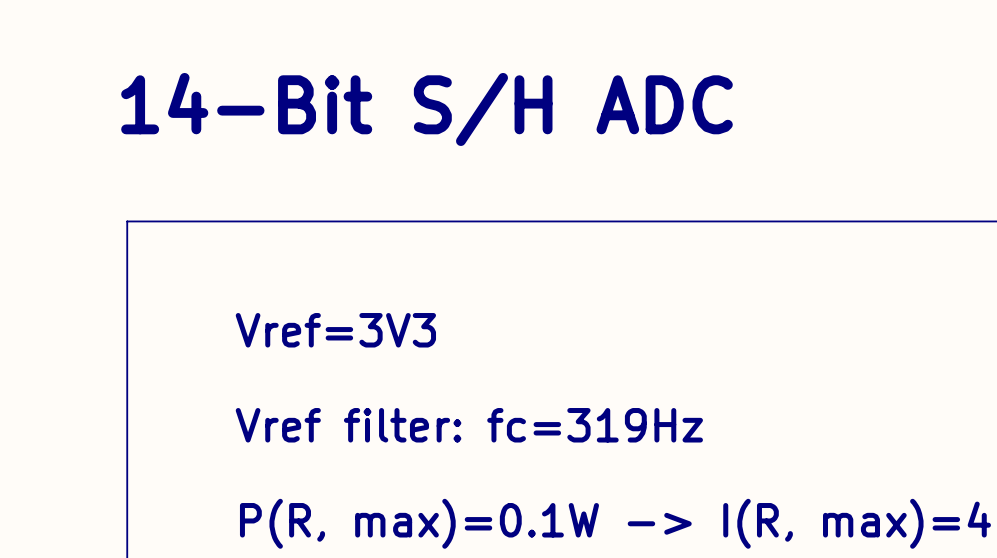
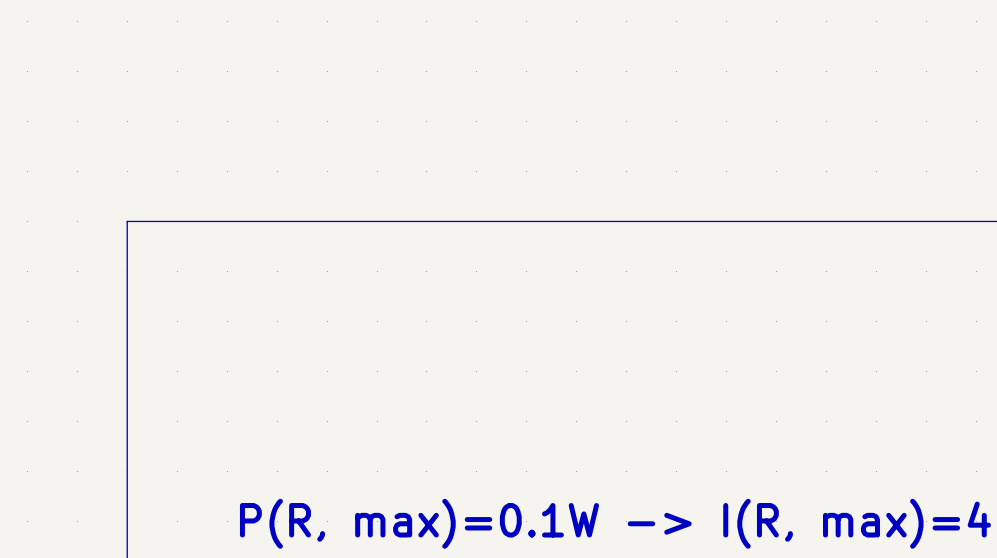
text: 14-Bit S/H ADC (426, 109) -> none
text: Vref=3V3 (335, 330) -> none
text: Vref filter: fc=319Hz (469, 425) -> none

